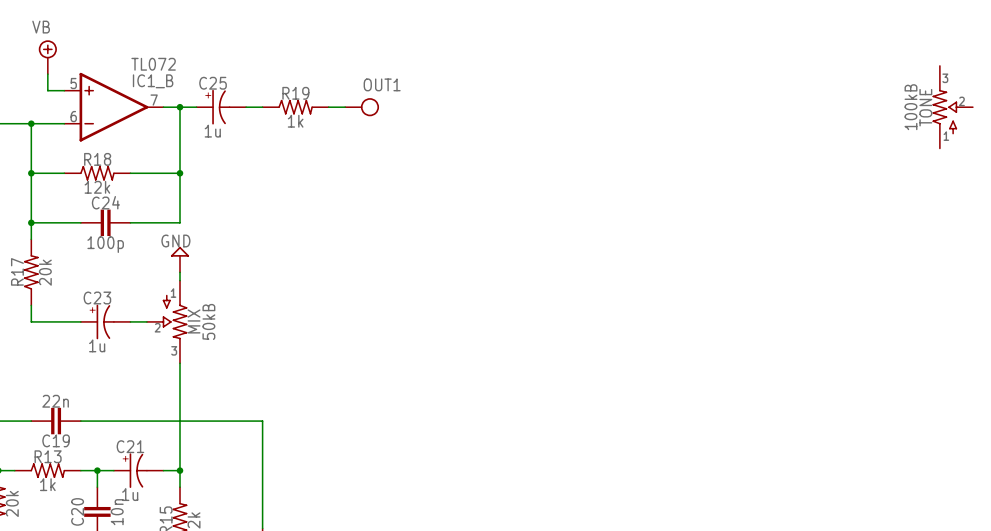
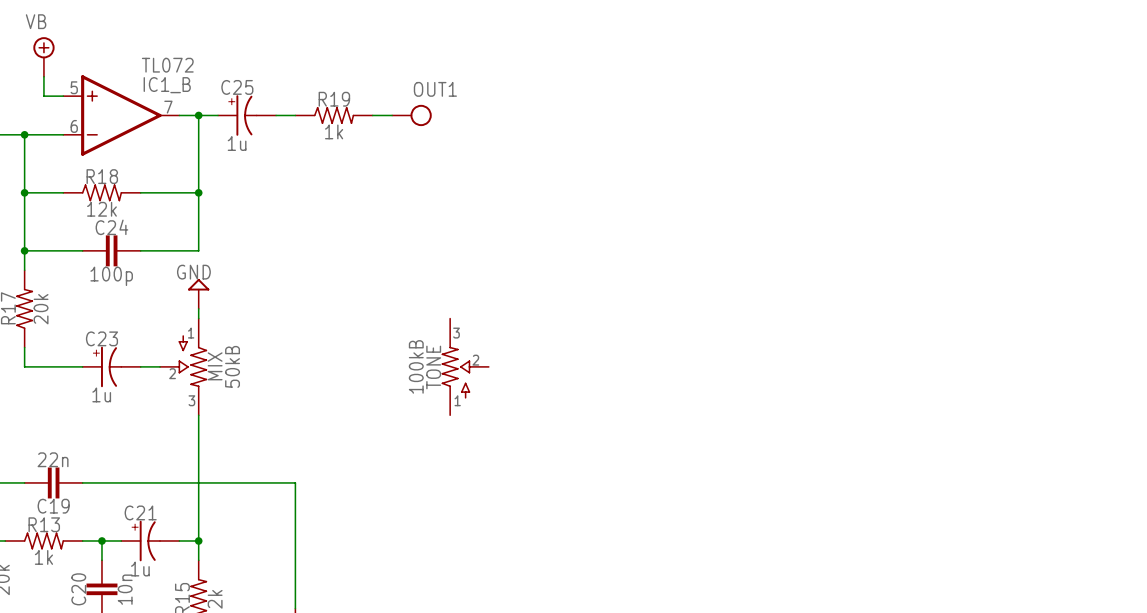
TONE: 100kB (953, 107) -> none
TONE: none -> 100kB (465, 366)

